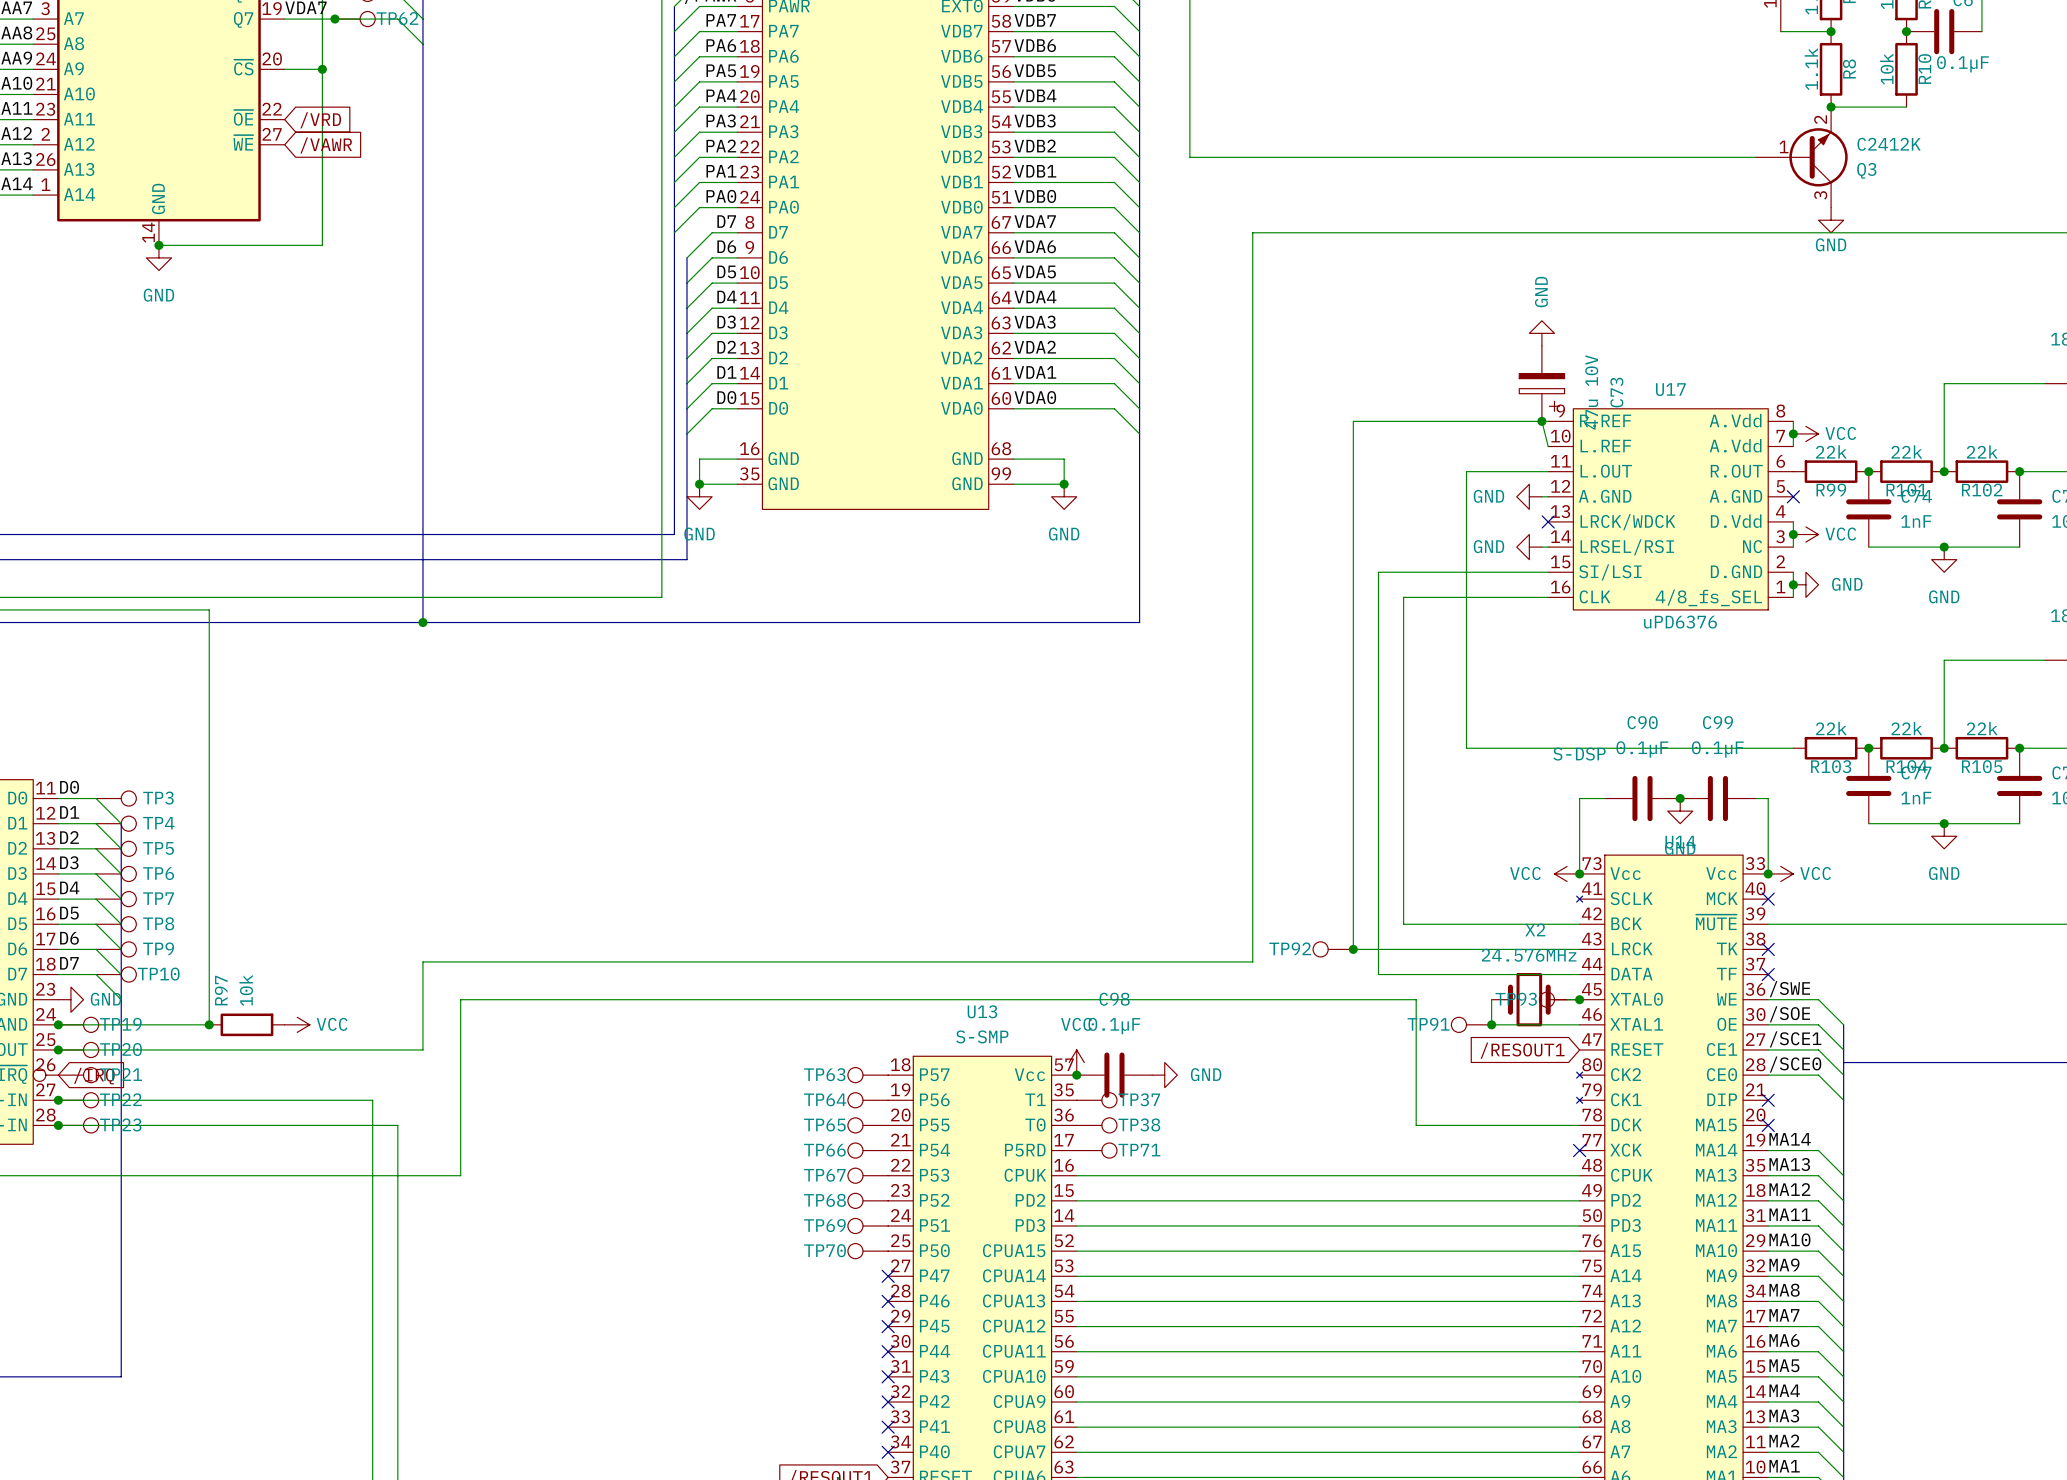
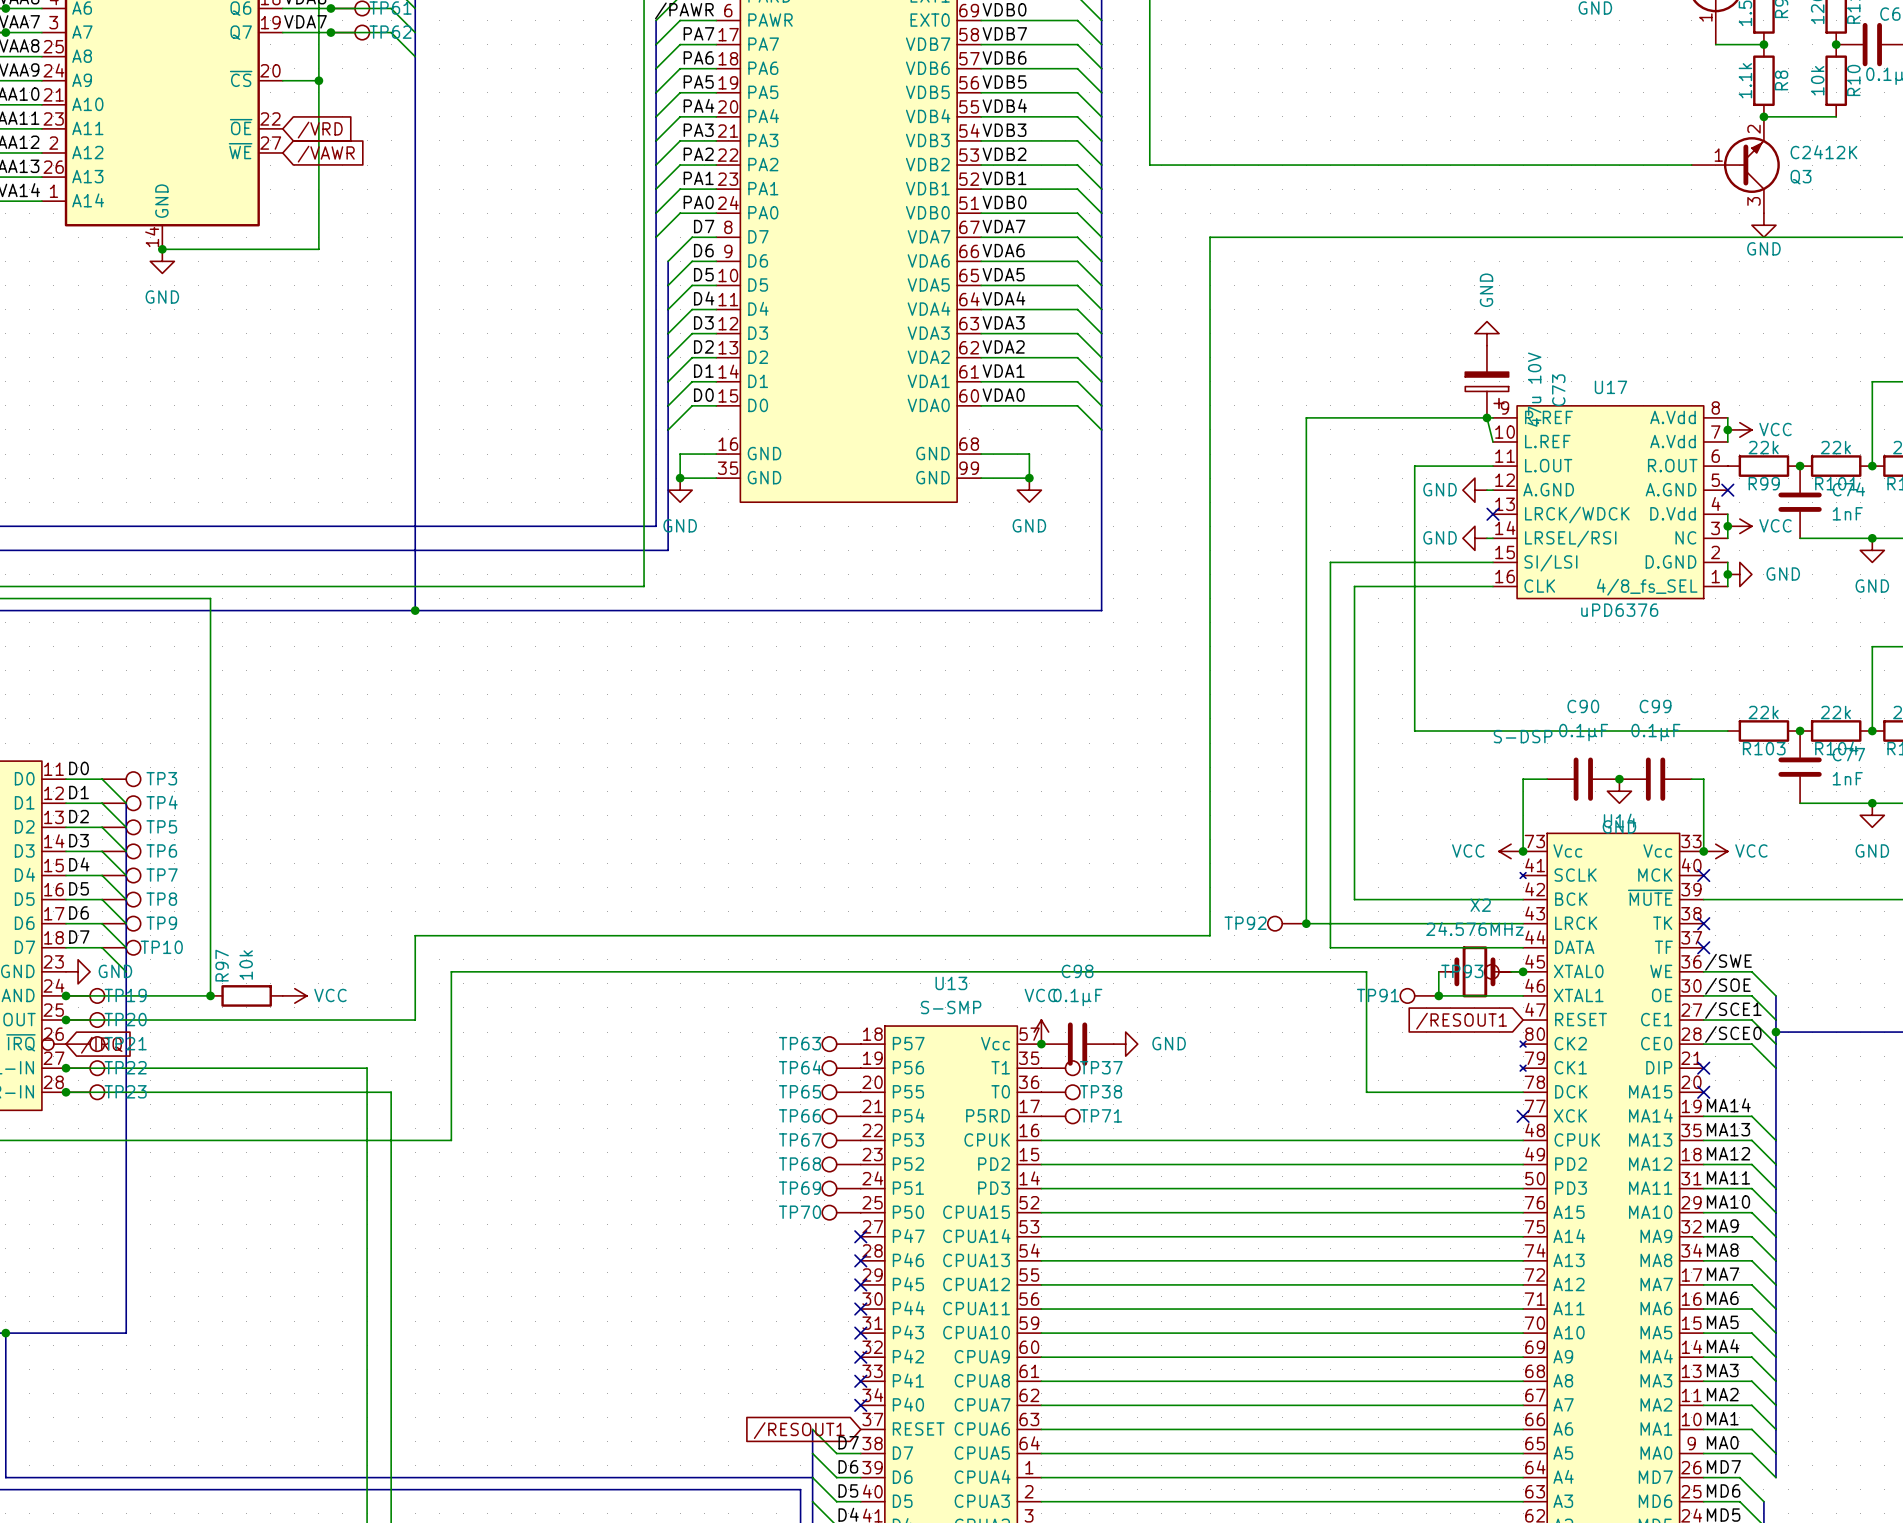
junction: none -> (1775, 1032)

